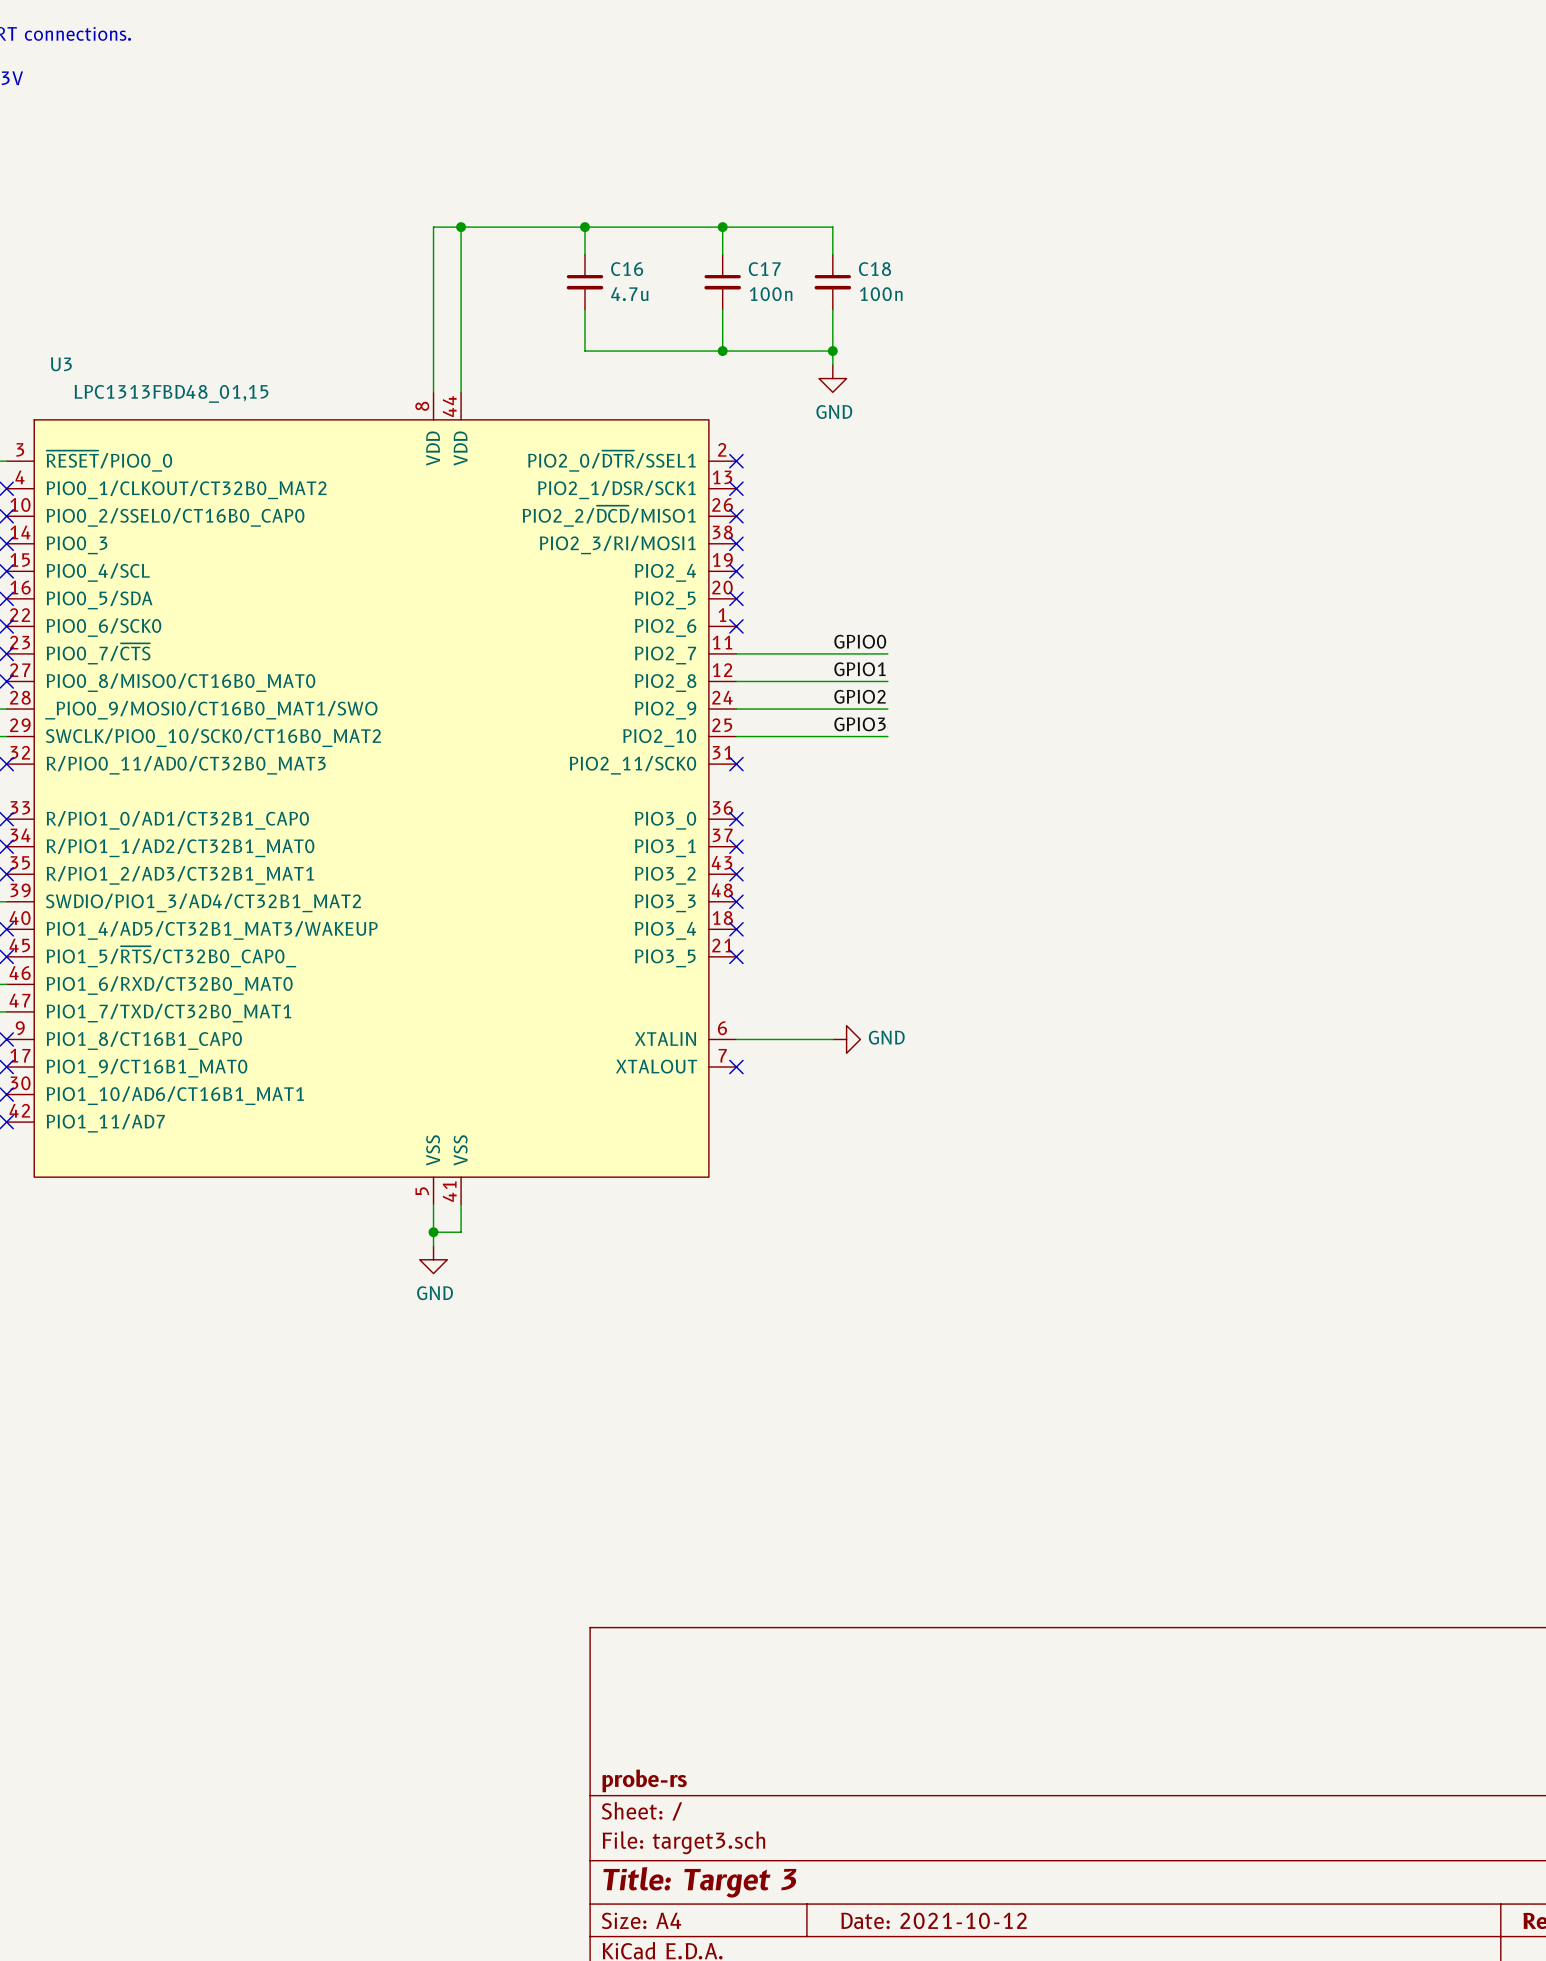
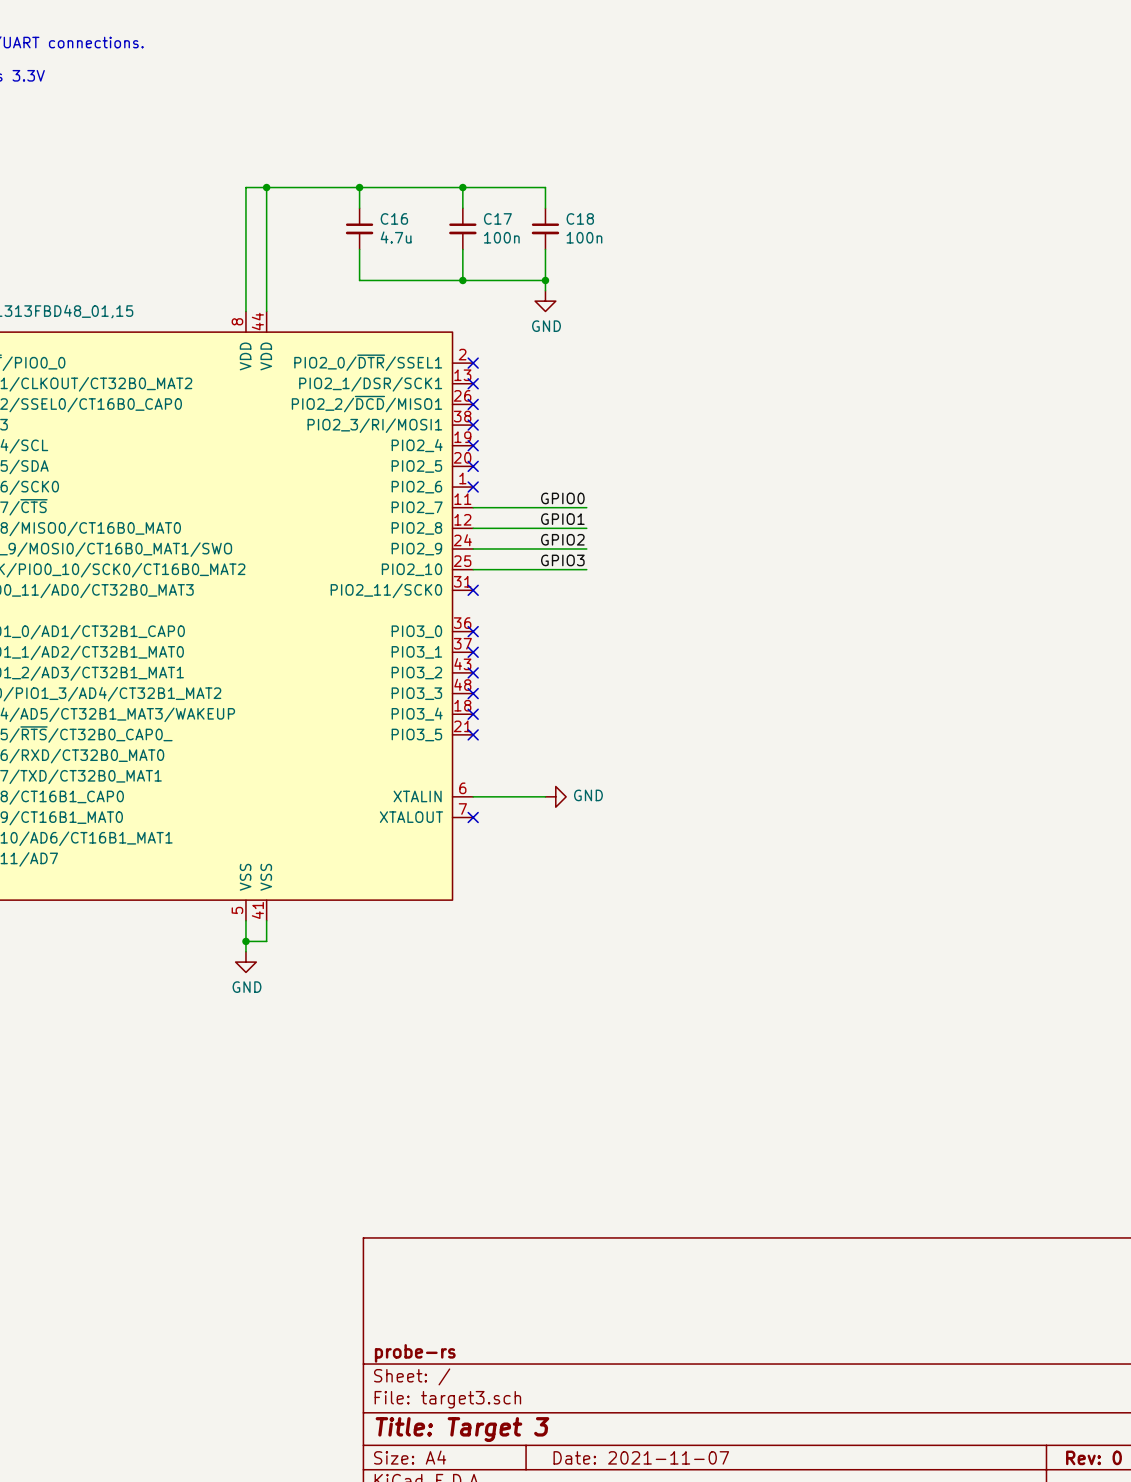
title block: Date: 2021-10-12 (934, 1920) -> Date: 2021-11-07 (641, 1457)

